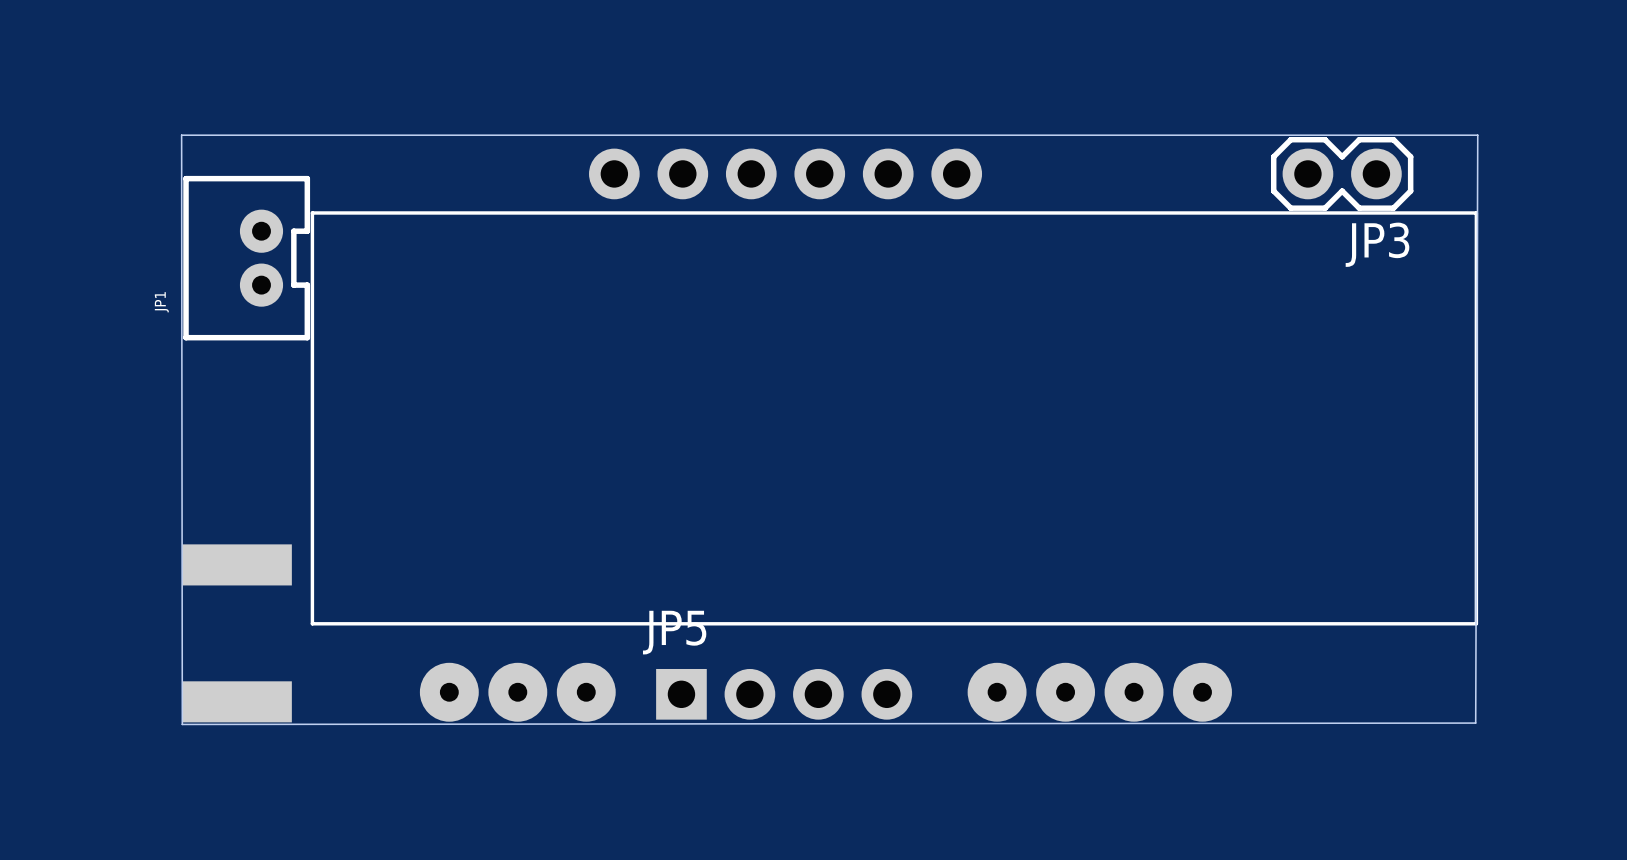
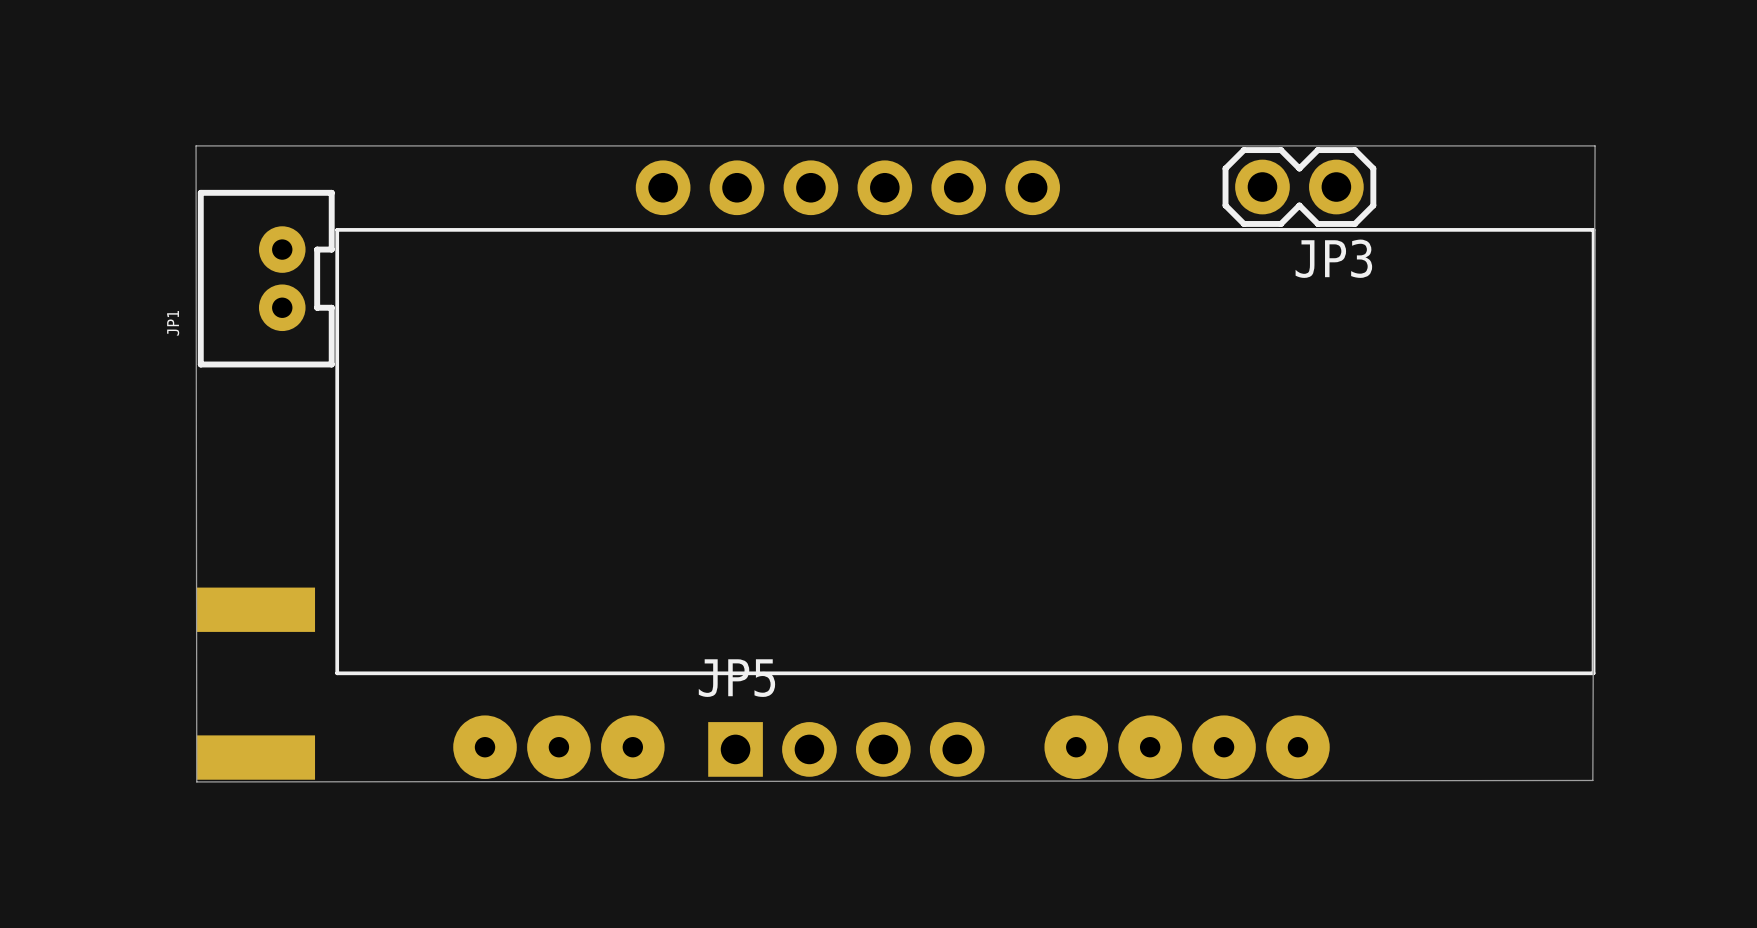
JP3 position: (1342, 173) -> (1299, 187)

